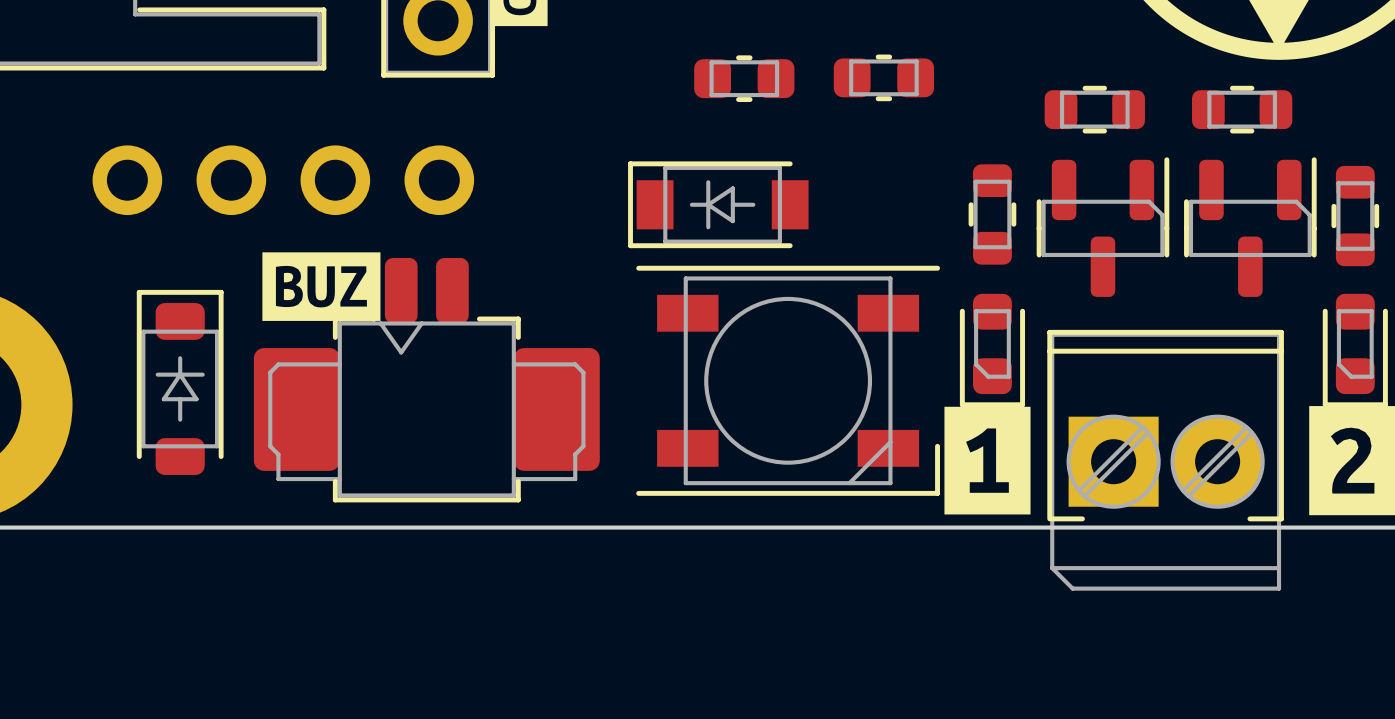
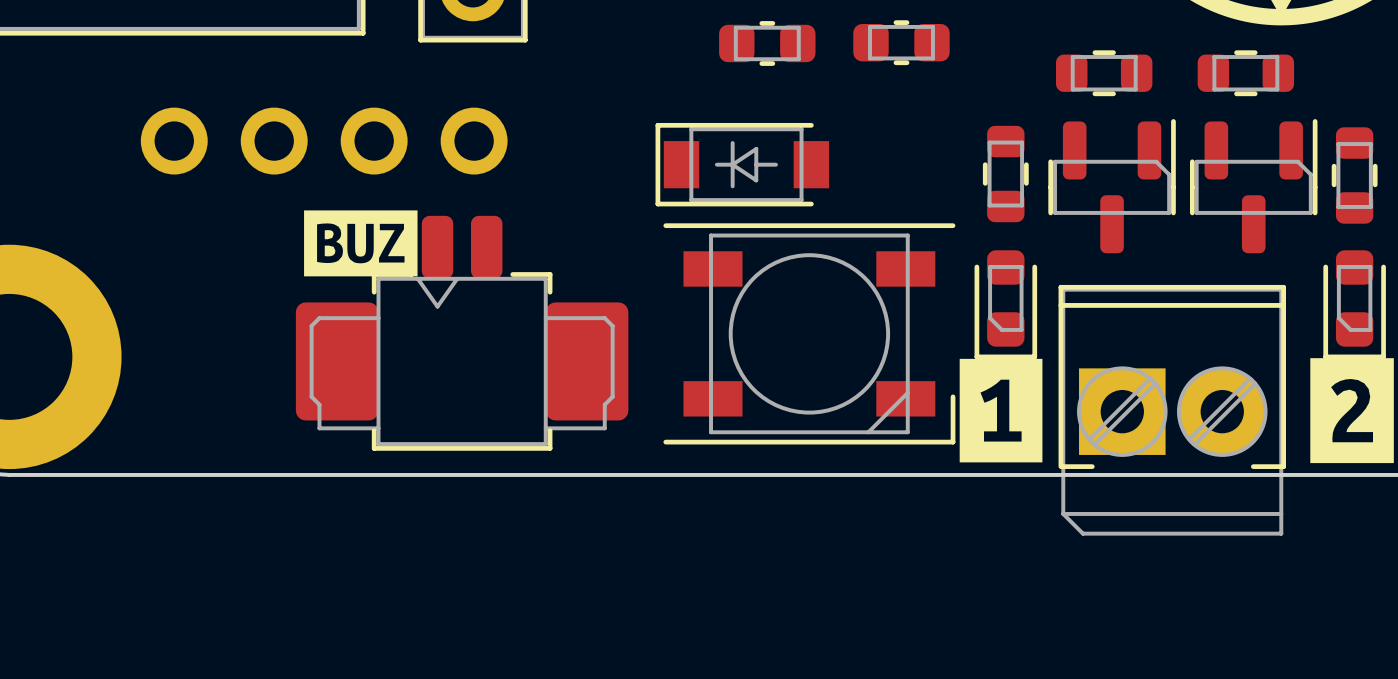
part: (180, 382) -> none

